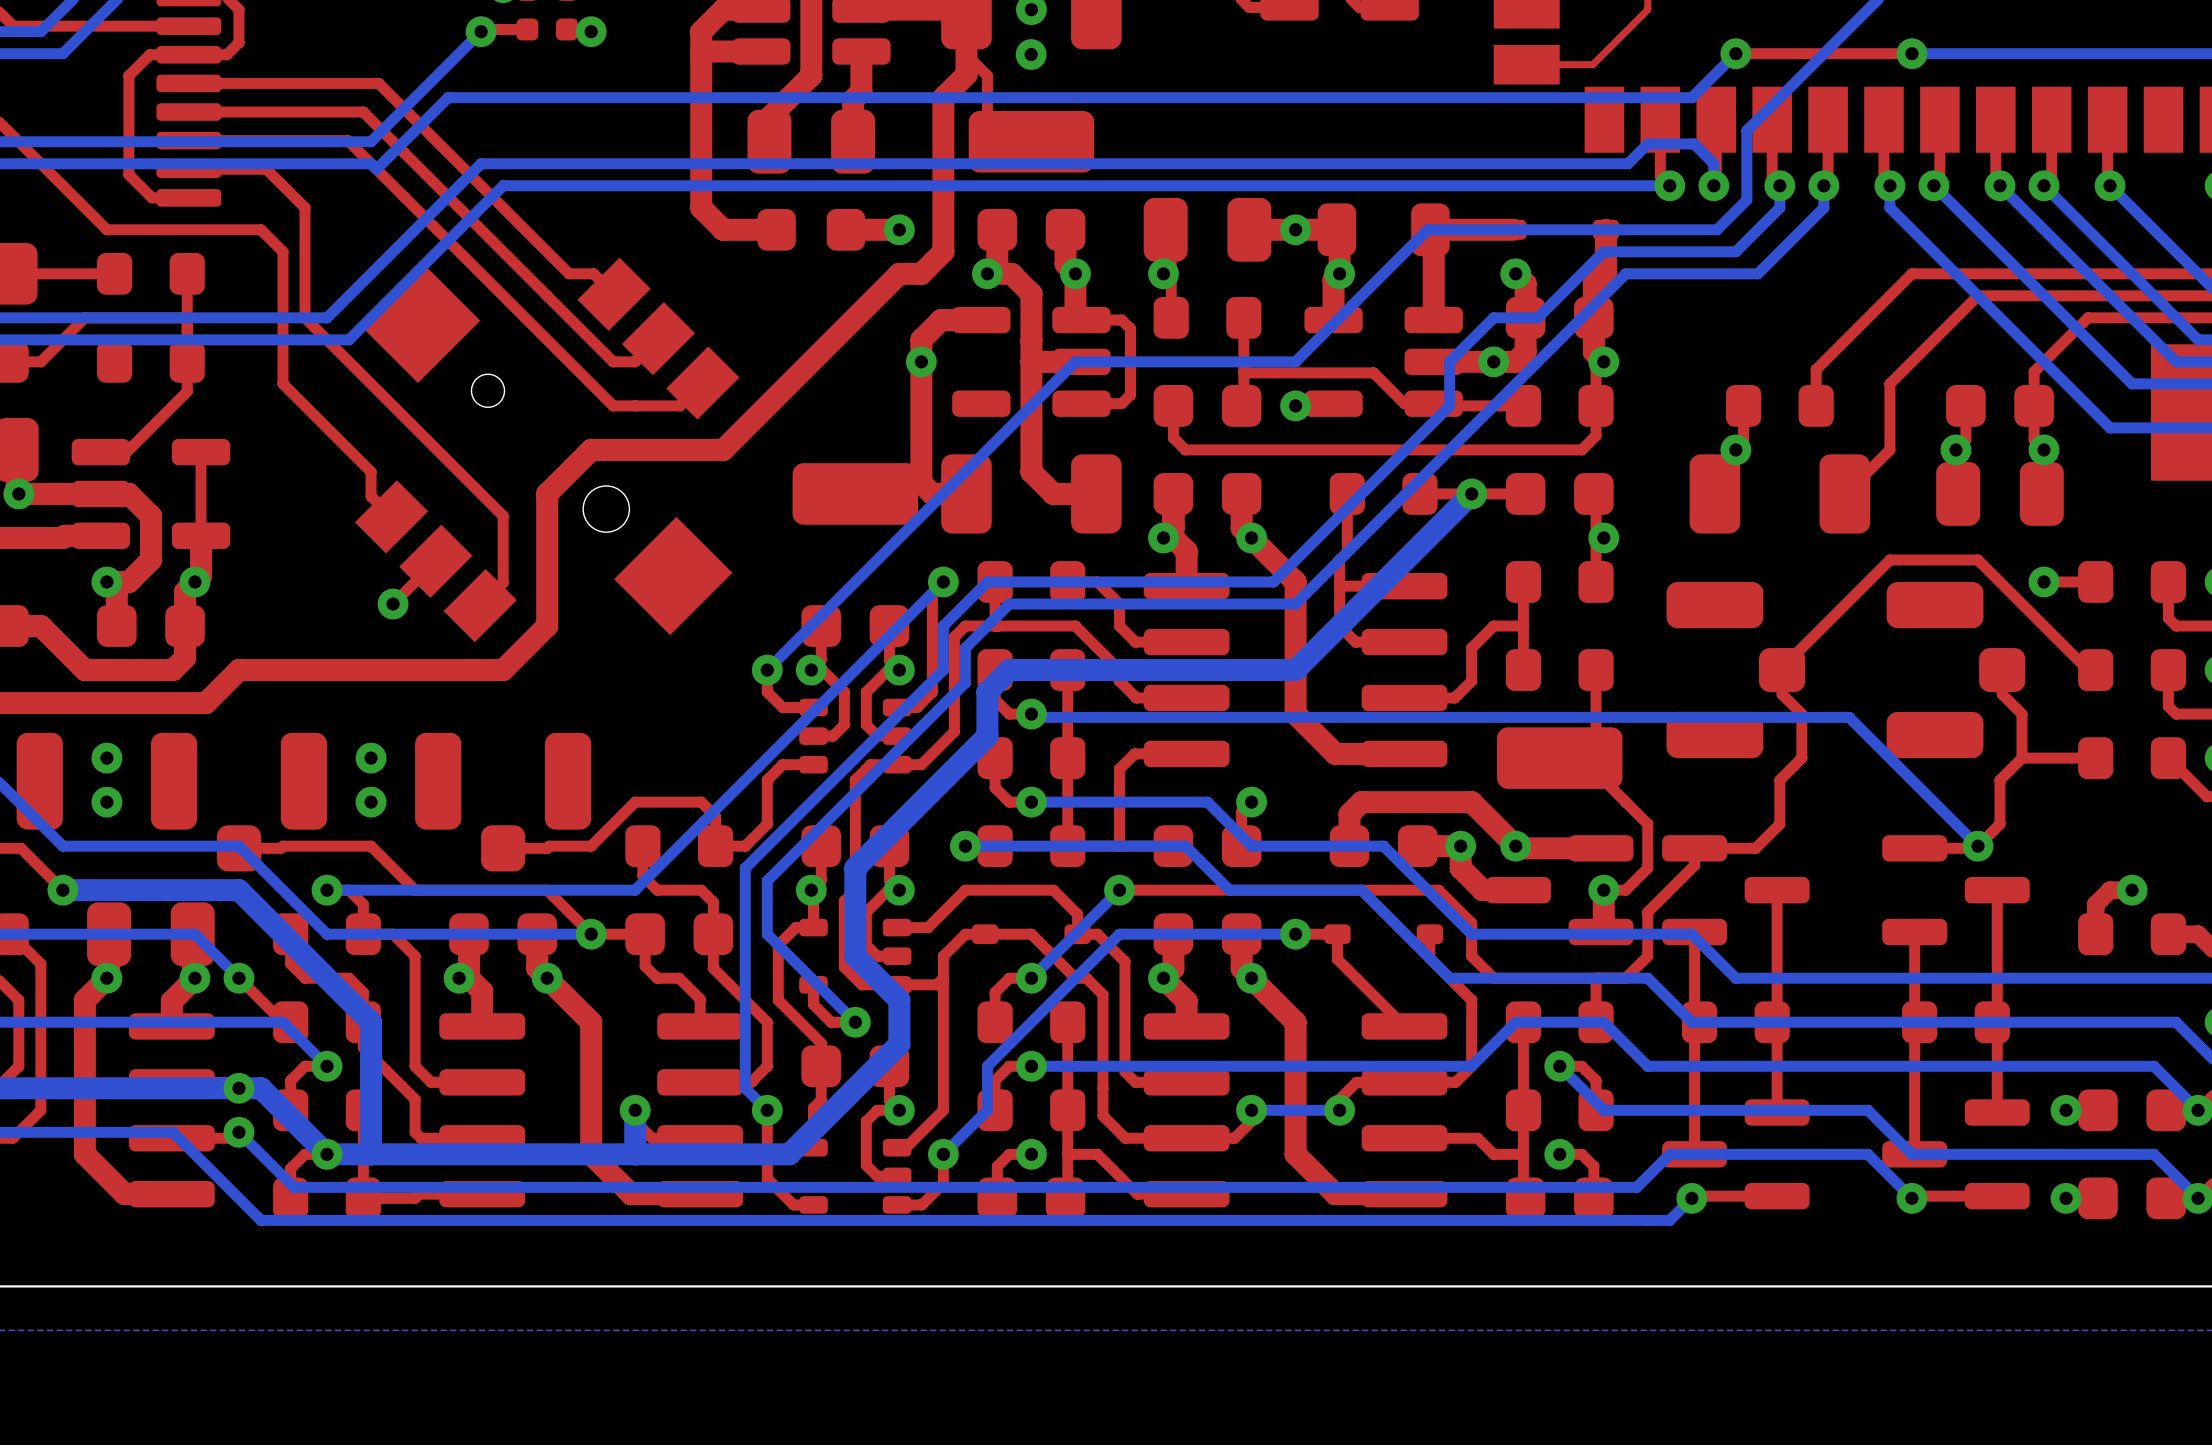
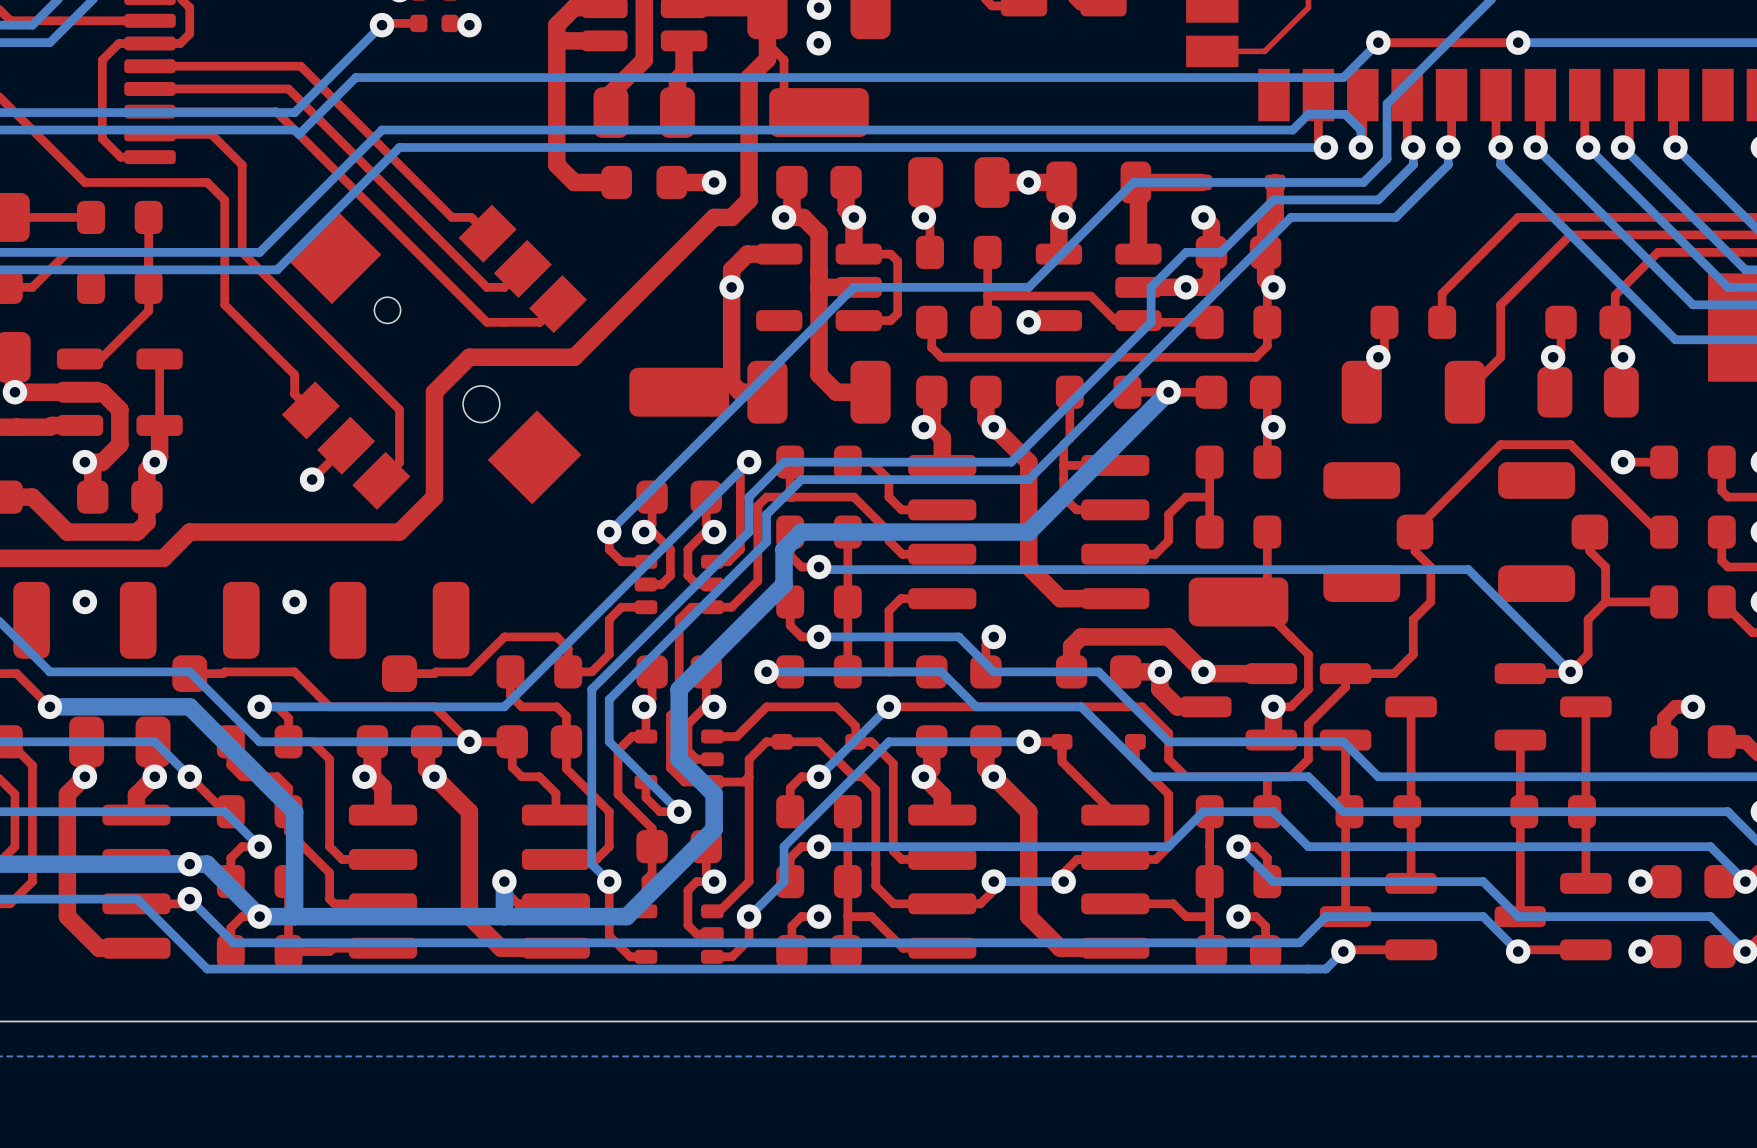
via: (106, 802) -> none
via: (371, 802) -> none

